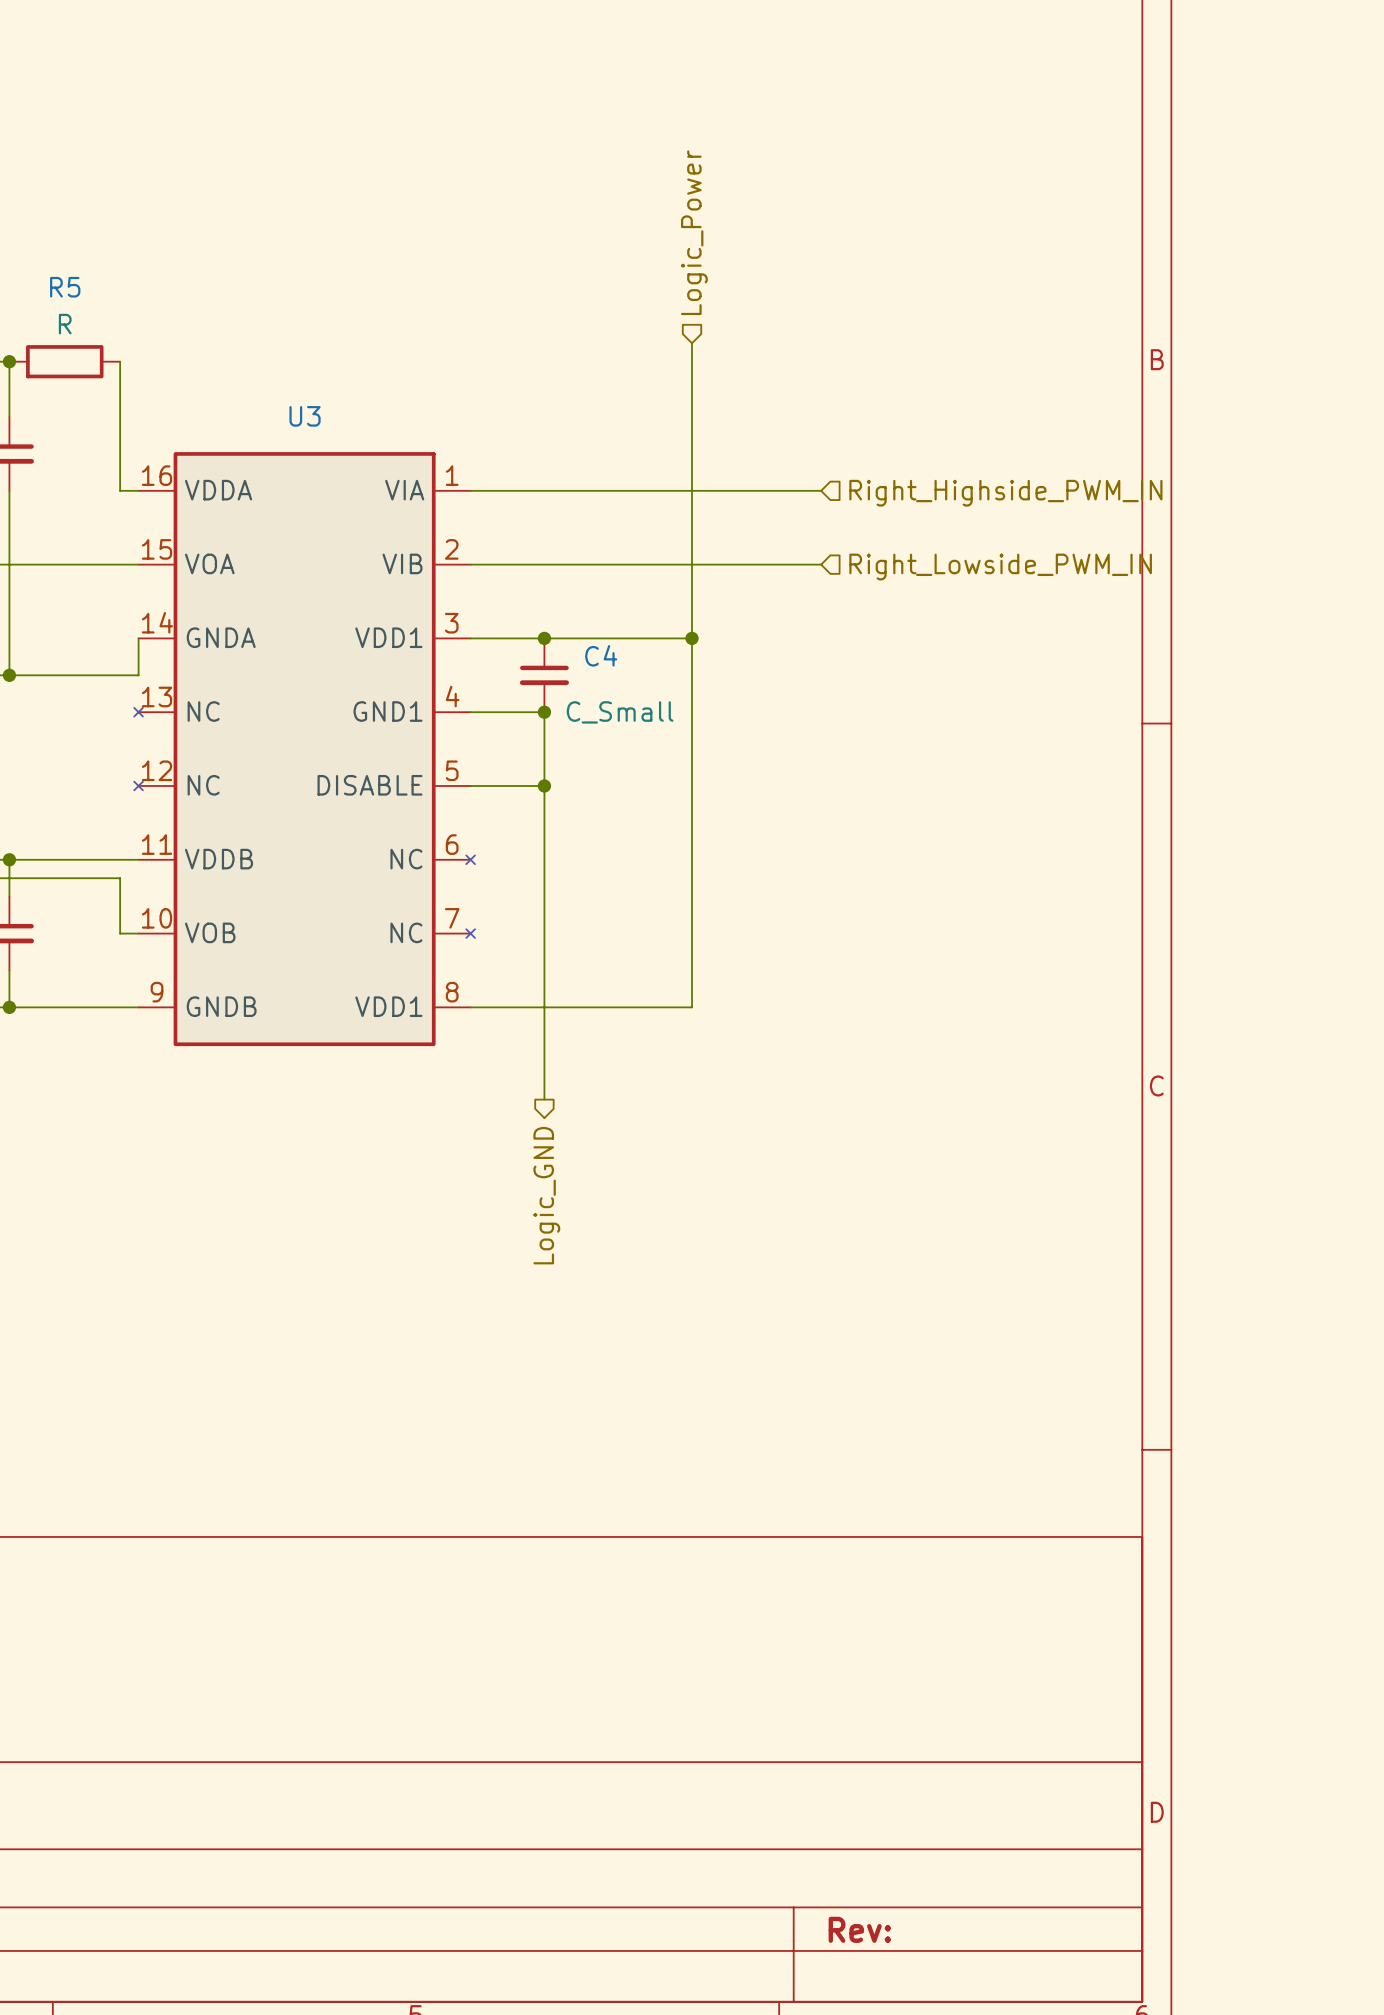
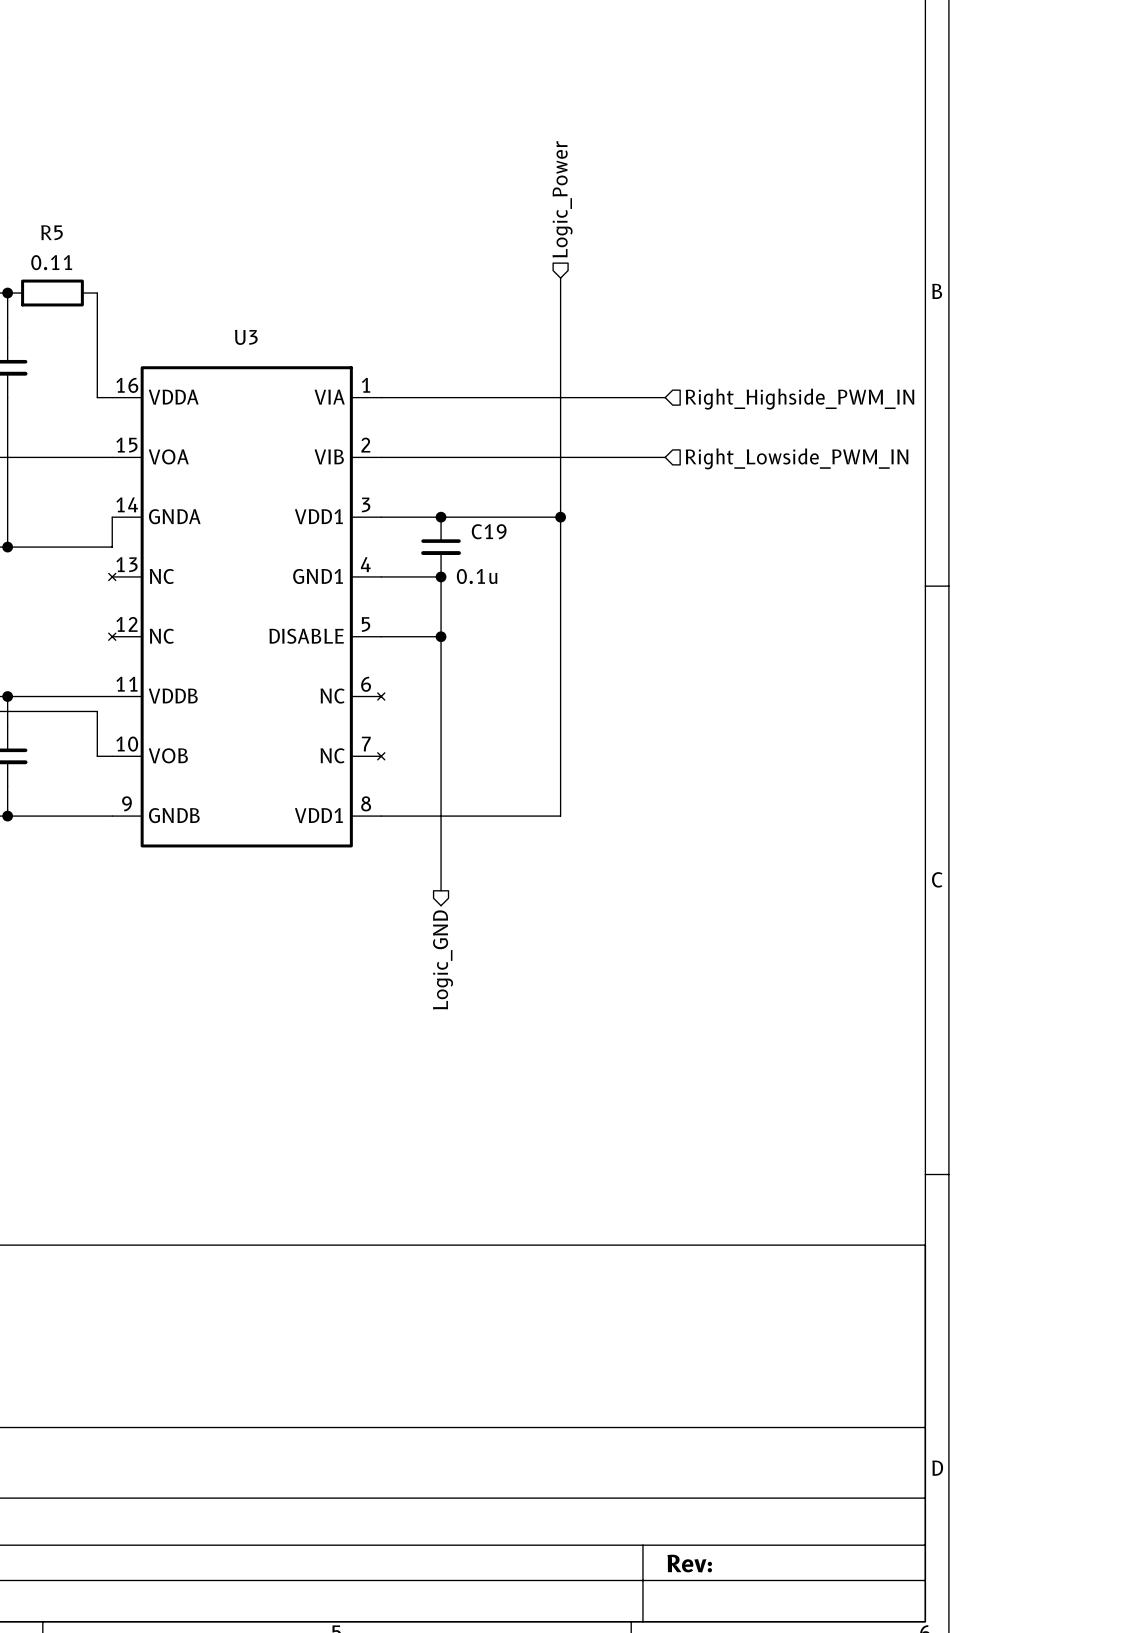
R5 value: R (65, 324) -> 0.11 (51, 262)
C4 name: C4 (601, 655) -> C19 (489, 531)
C4 value: C_Small (620, 712) -> 0.1u (477, 576)

